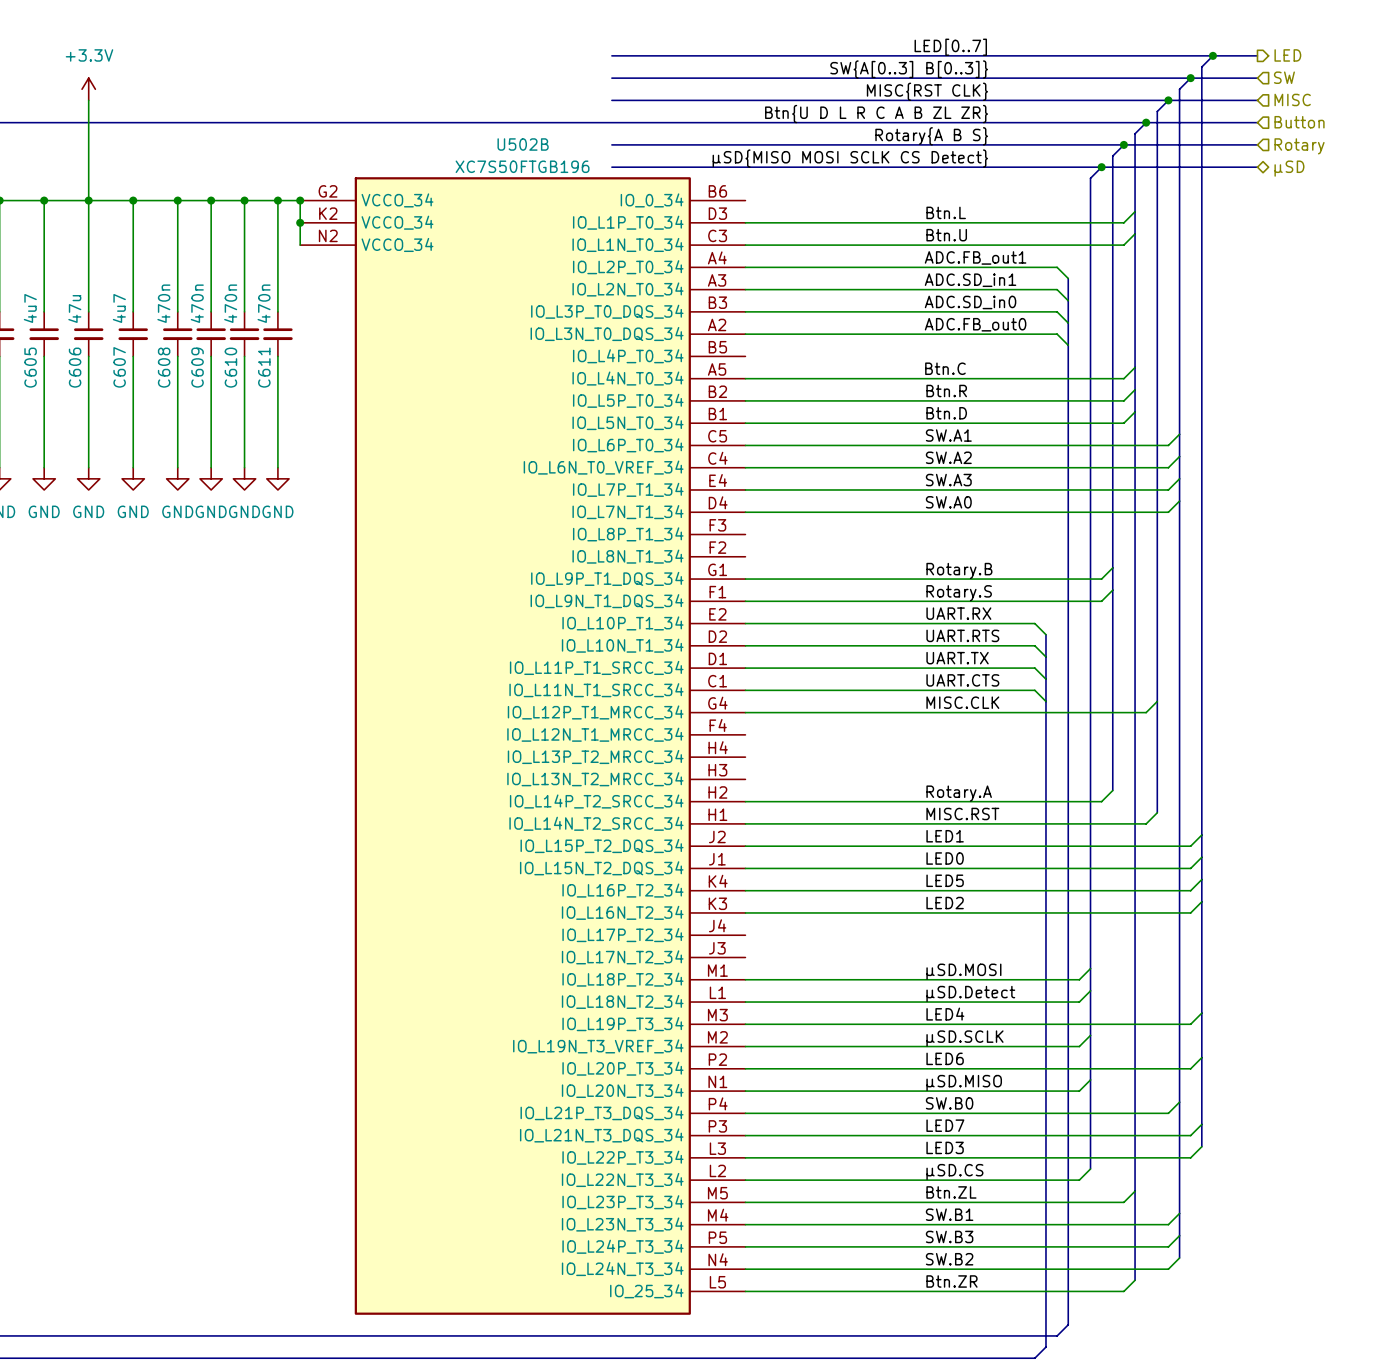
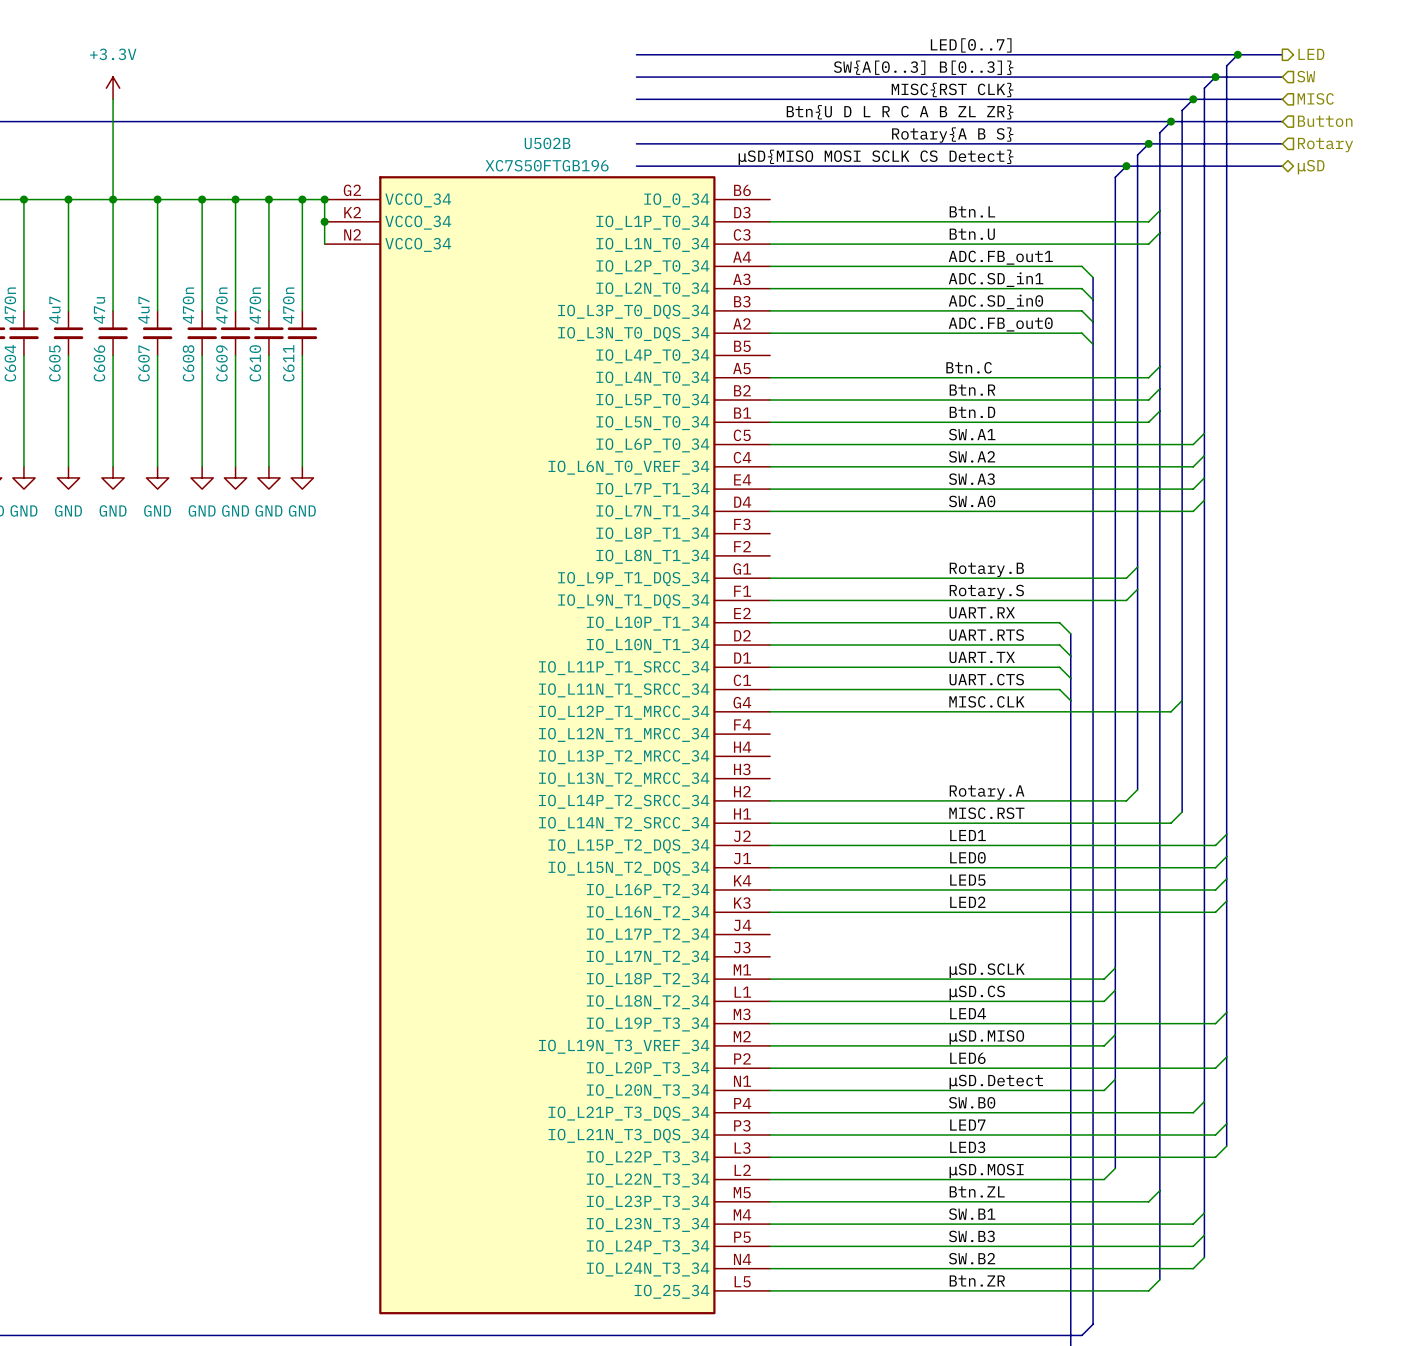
label: μSD.MOSI (963, 971) -> μSD.SCLK (987, 970)
label: μSD.Detect (970, 993) -> μSD.CS (977, 992)
label: μSD.SCLK (964, 1038) -> μSD.MISO (986, 1037)
label: μSD.MISO (964, 1082) -> μSD.Detect (996, 1082)
label: μSD.CS (954, 1172) -> μSD.MOSI (986, 1171)

